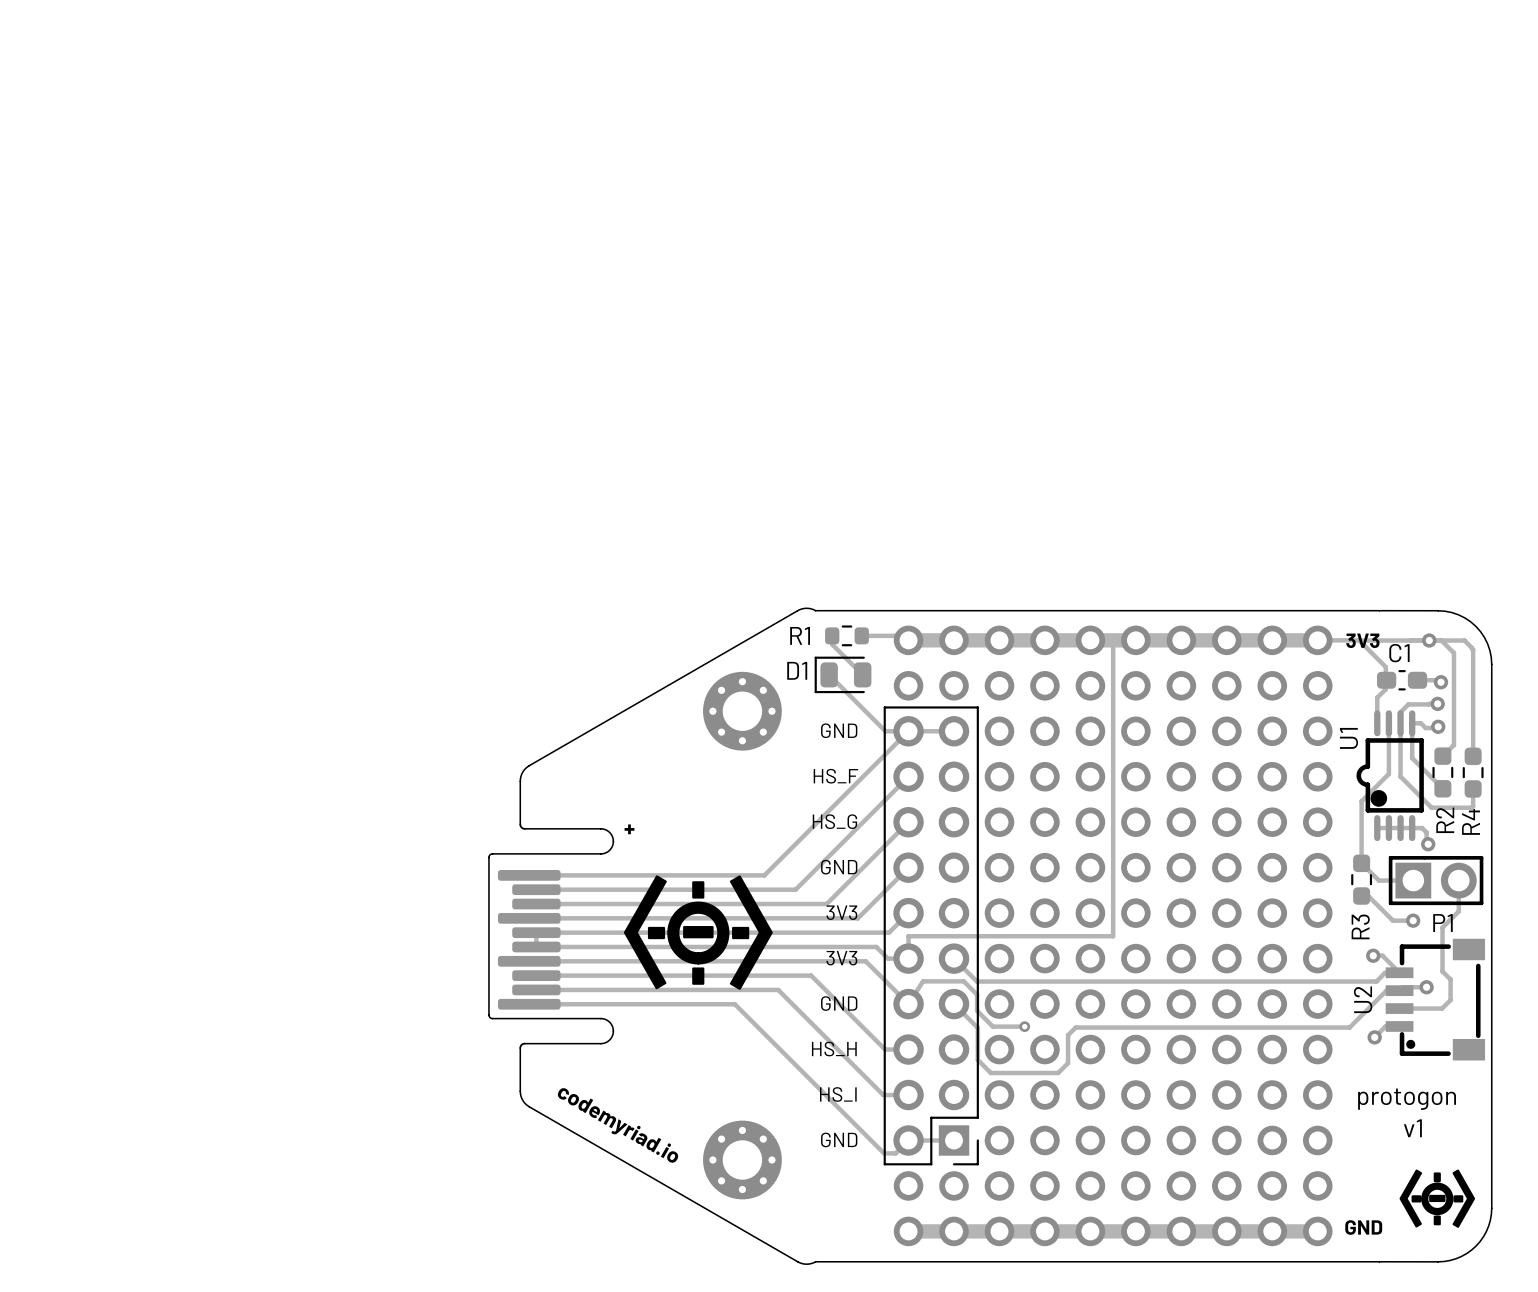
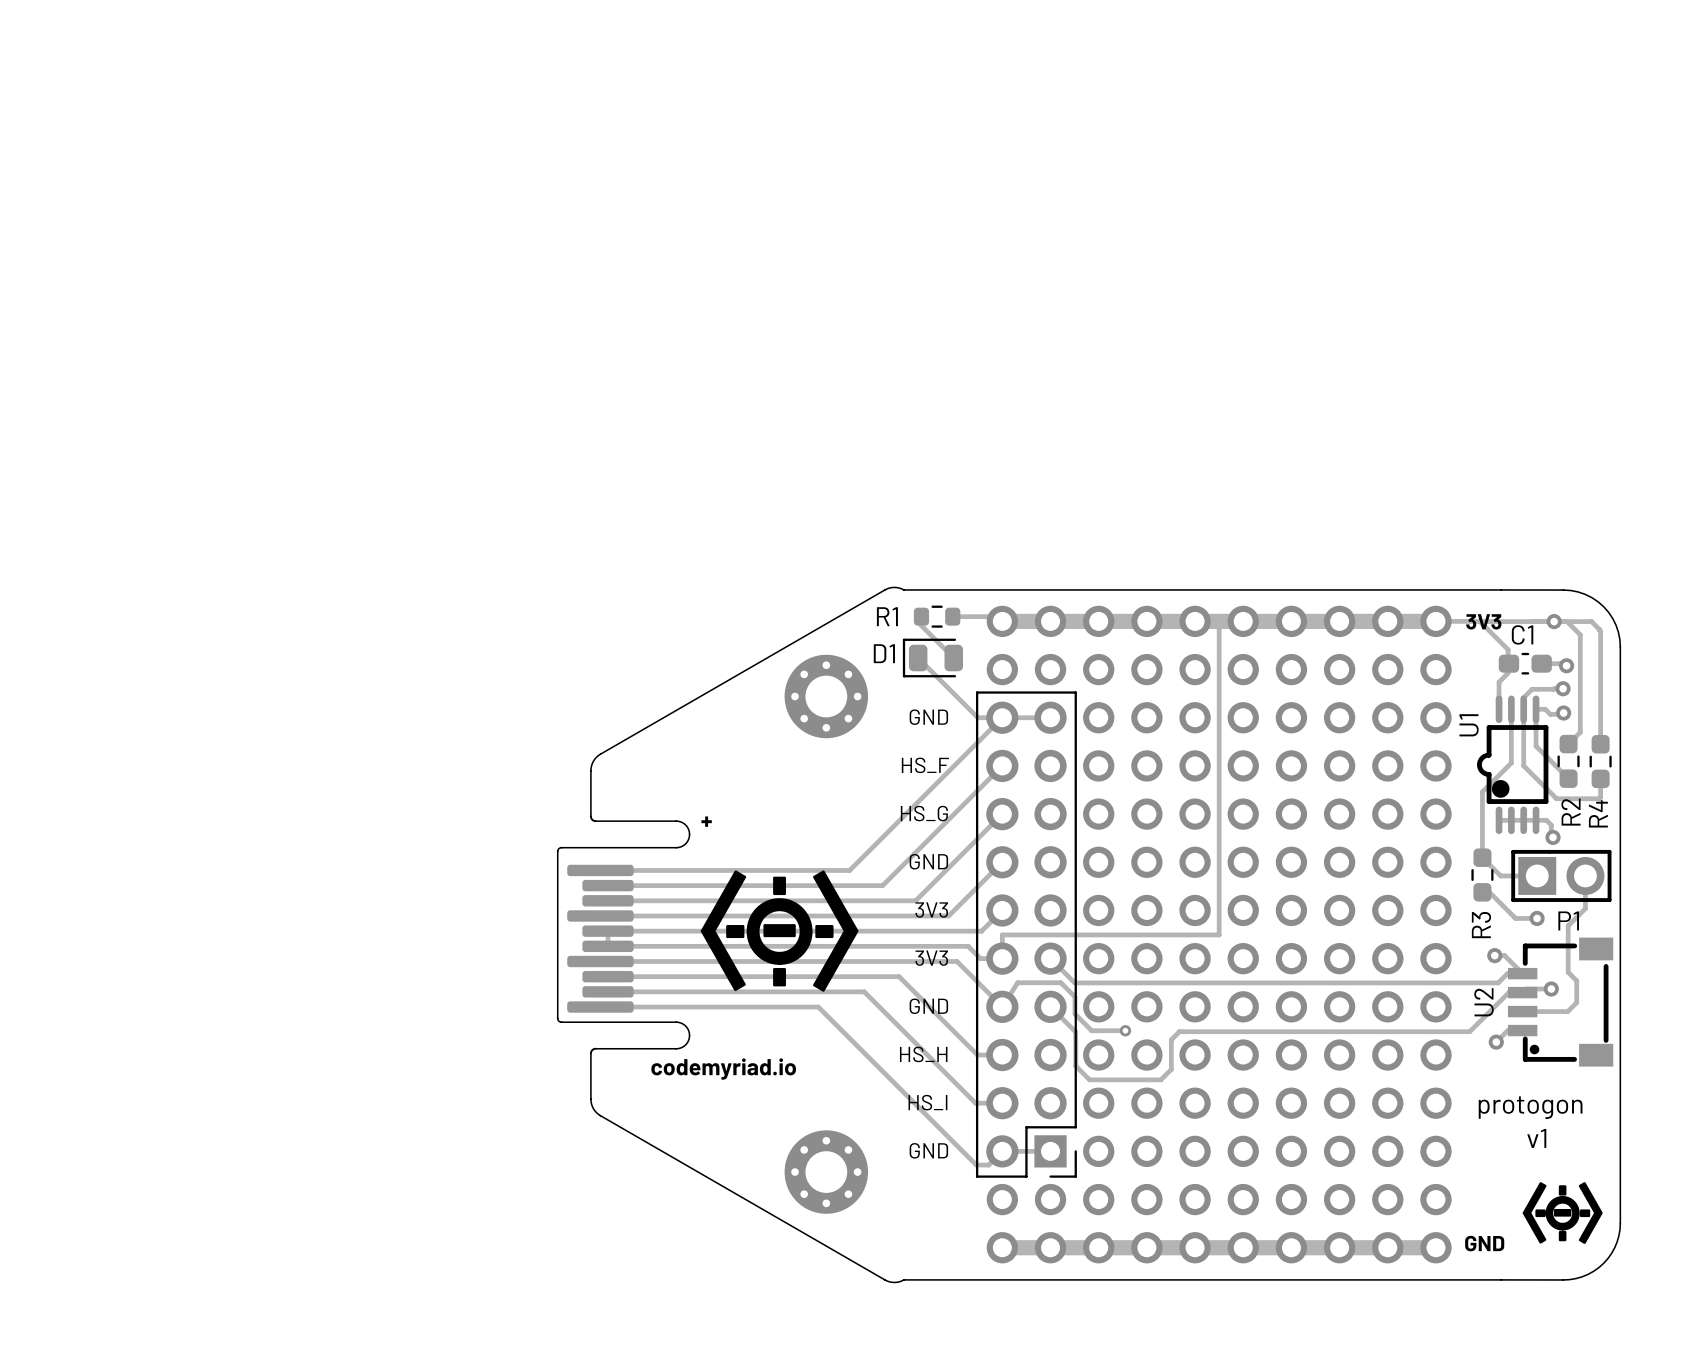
text rotation: 0° (618, 1125) -> 30° counterclockwise (723, 1069)

